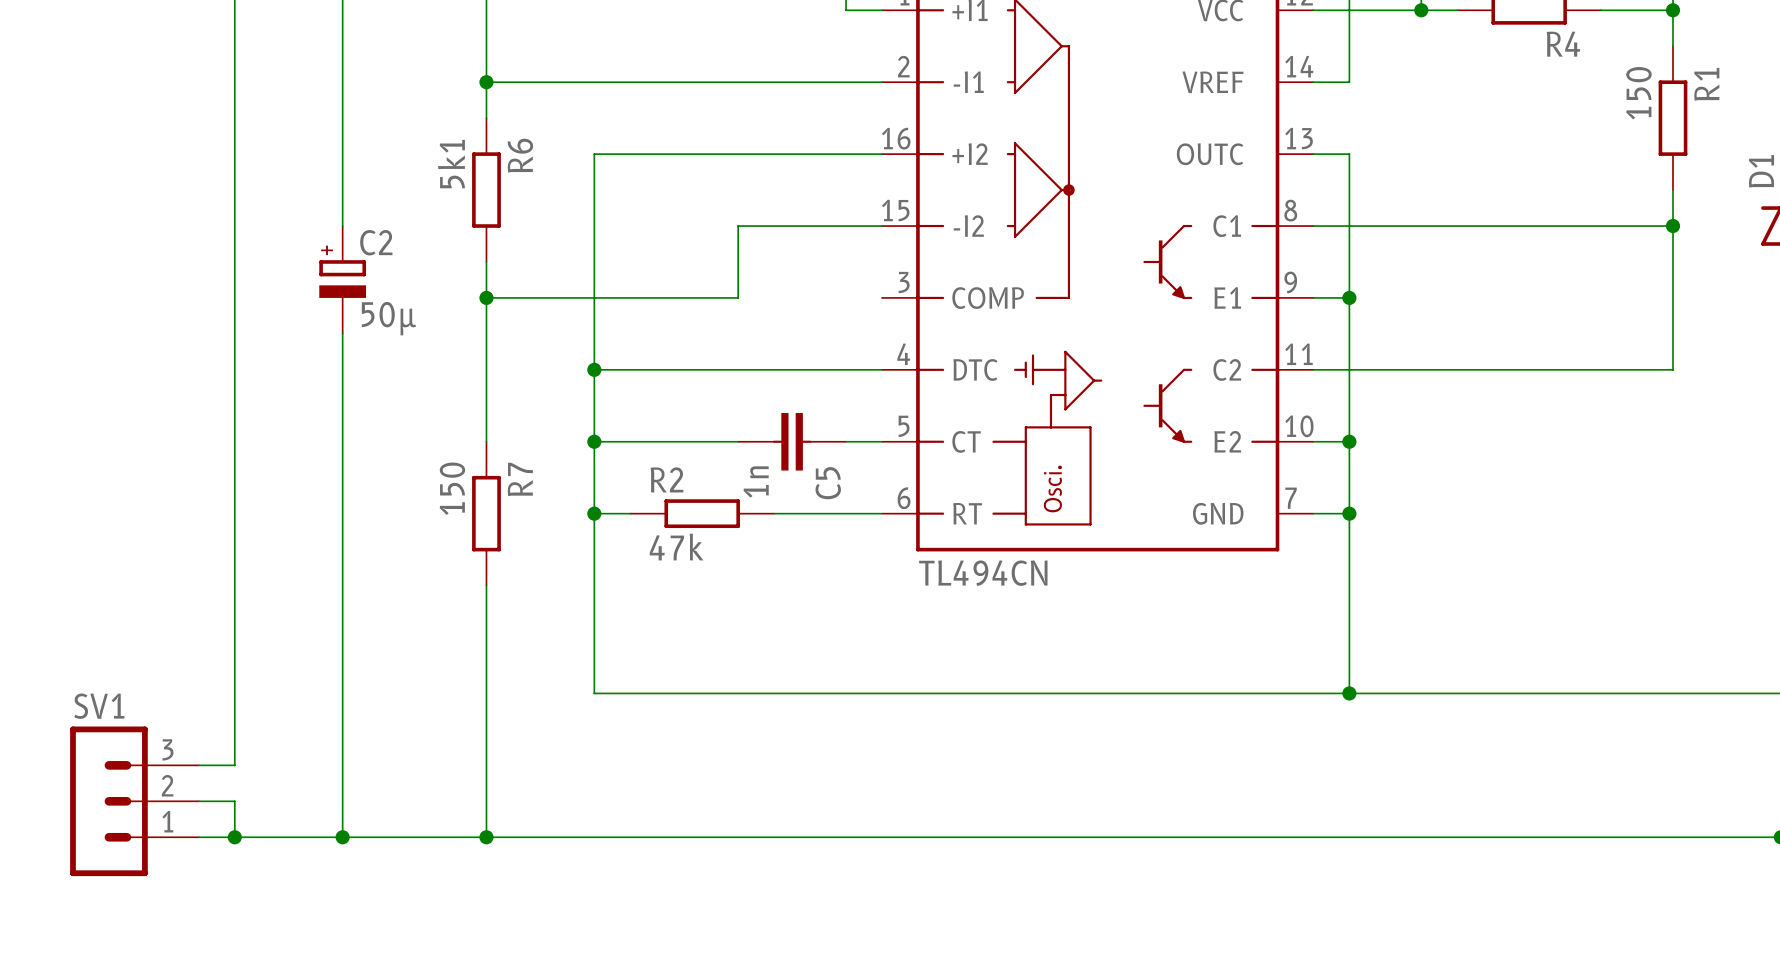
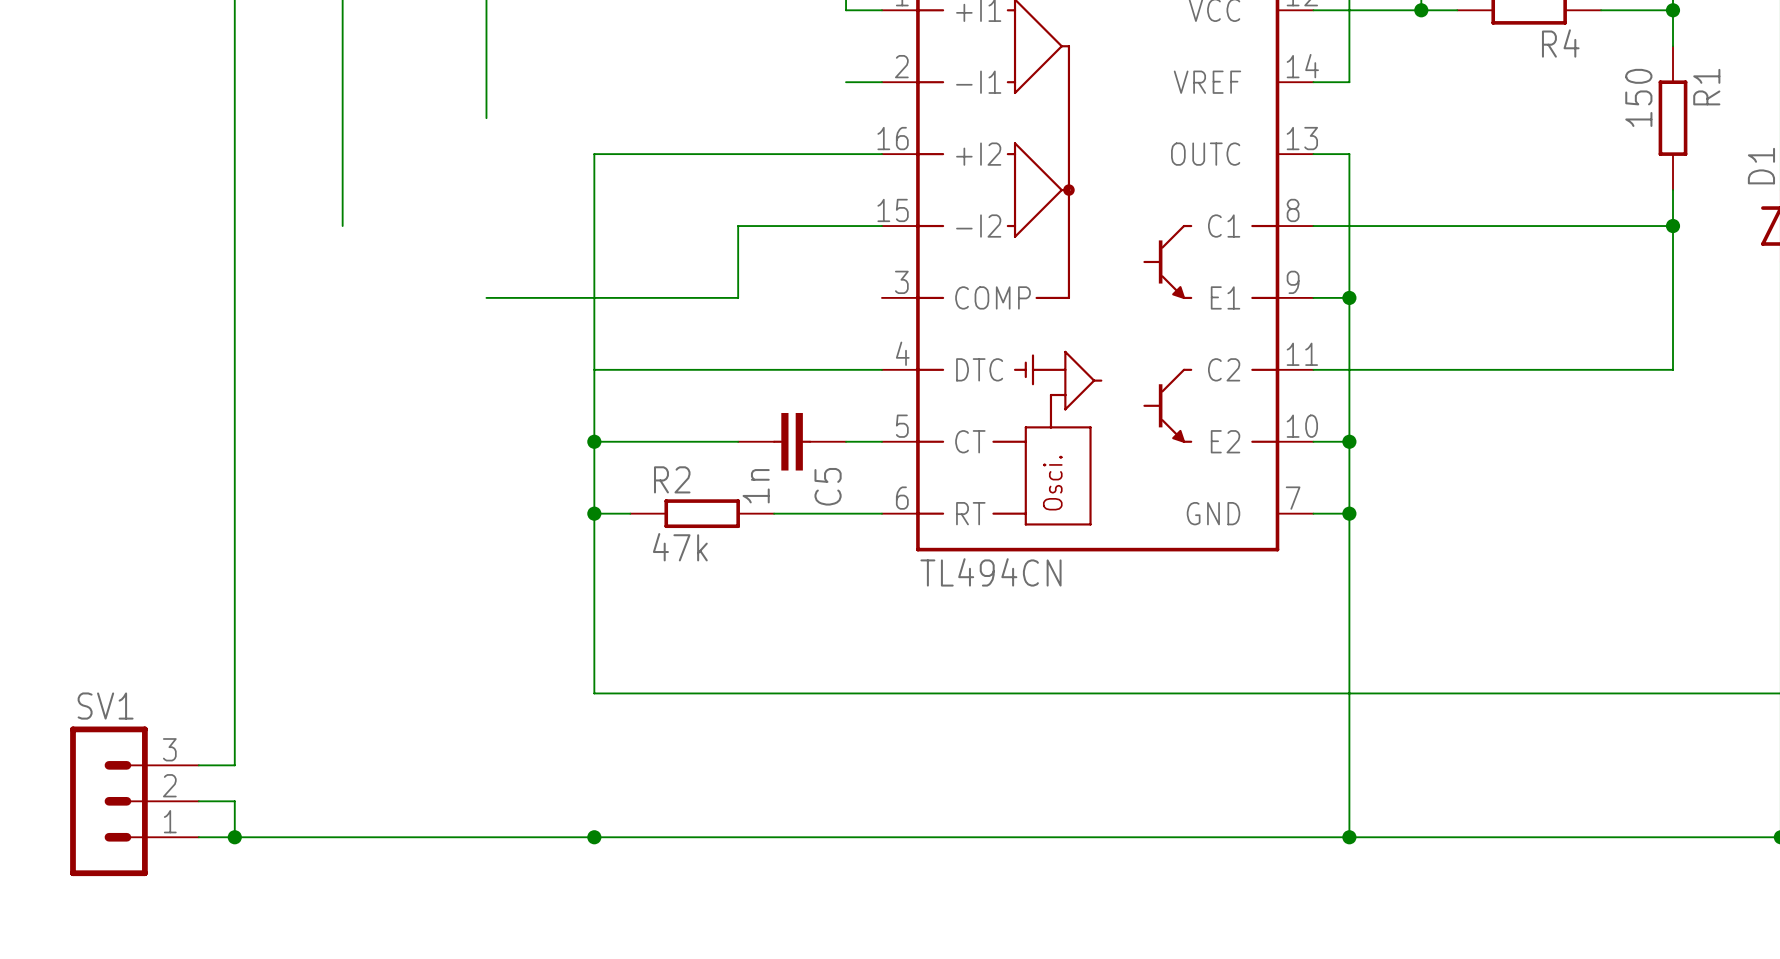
wire: (486, 82) (846, 82) -> none
junction: (486, 82) -> none
R6: 5k1 (486, 190) -> none
wire: (486, 261) (486, 441) -> none
C2: 50µ (342, 279) -> none
junction: (486, 297) -> none
wire: (342, 333) (342, 837) -> none
junction: (594, 369) -> none
R7: 150 (486, 513) -> none
wire: (486, 585) (486, 837) -> none
wire: none -> (1349, 693) (1349, 837)
junction: (1349, 693) -> none
junction: (342, 837) -> none
junction: (486, 837) -> none
junction: none -> (594, 837)
junction: none -> (1349, 837)

